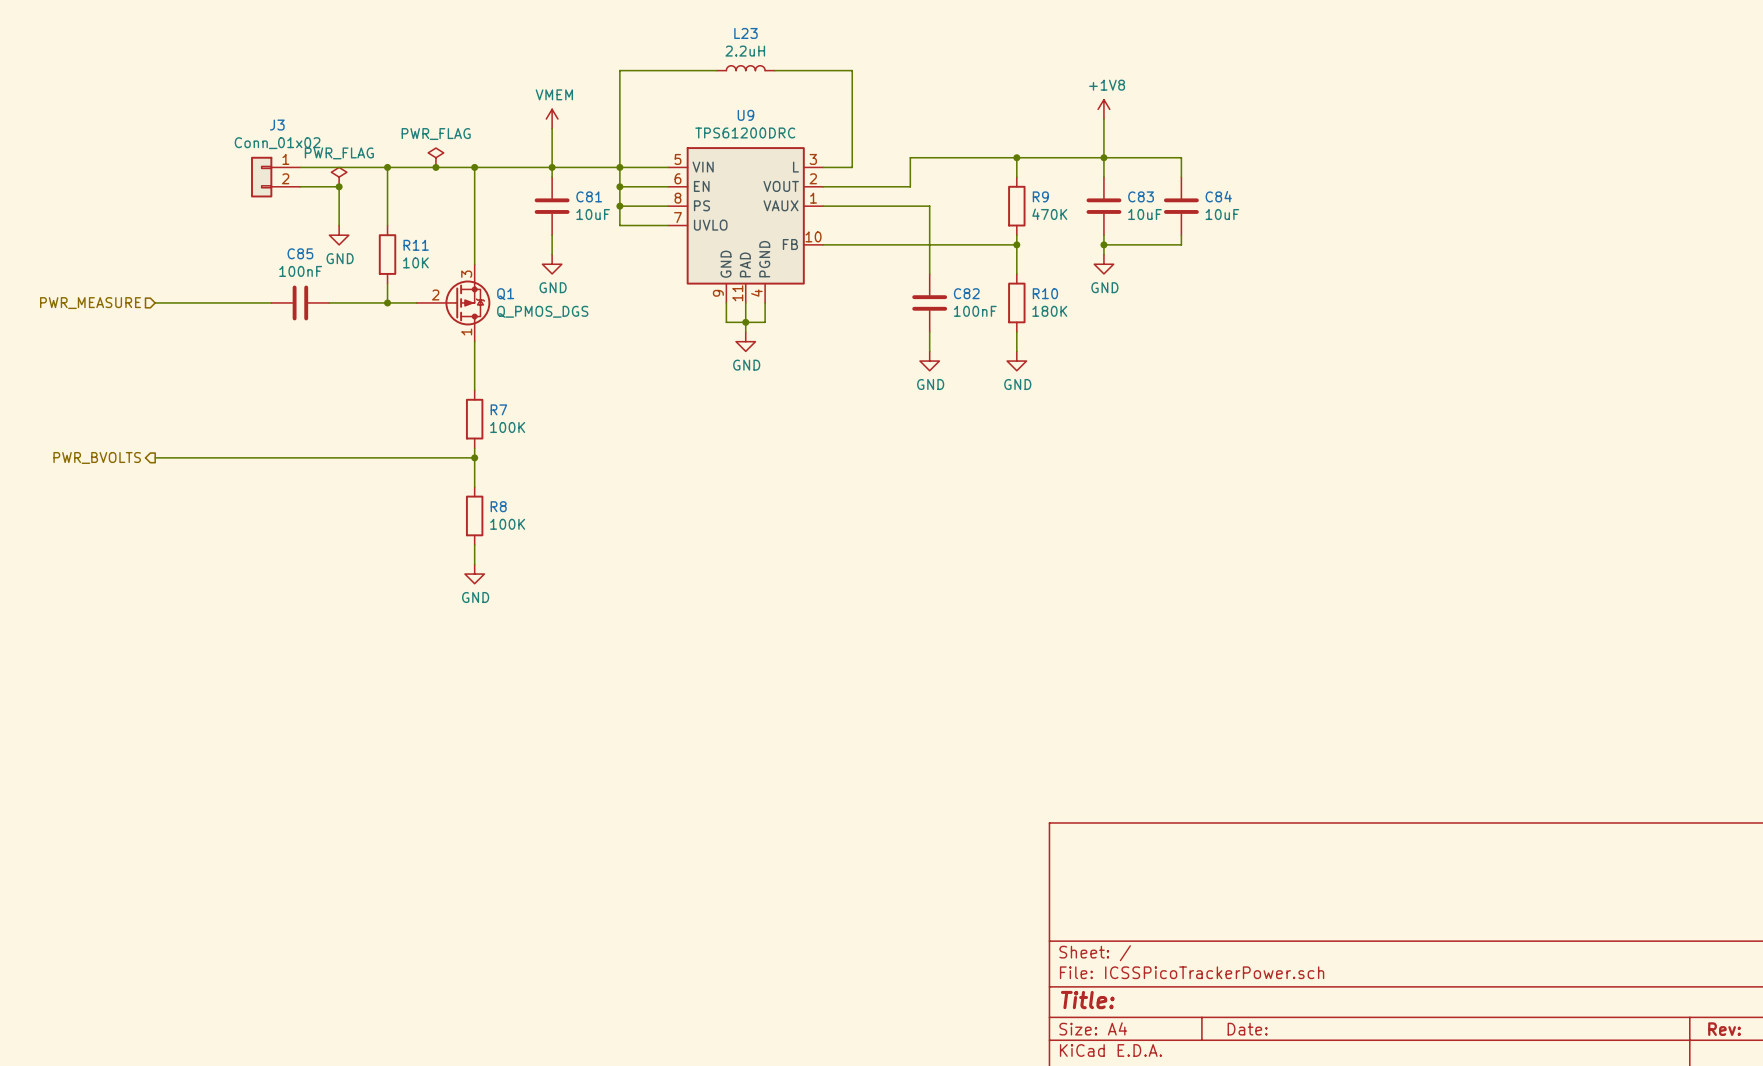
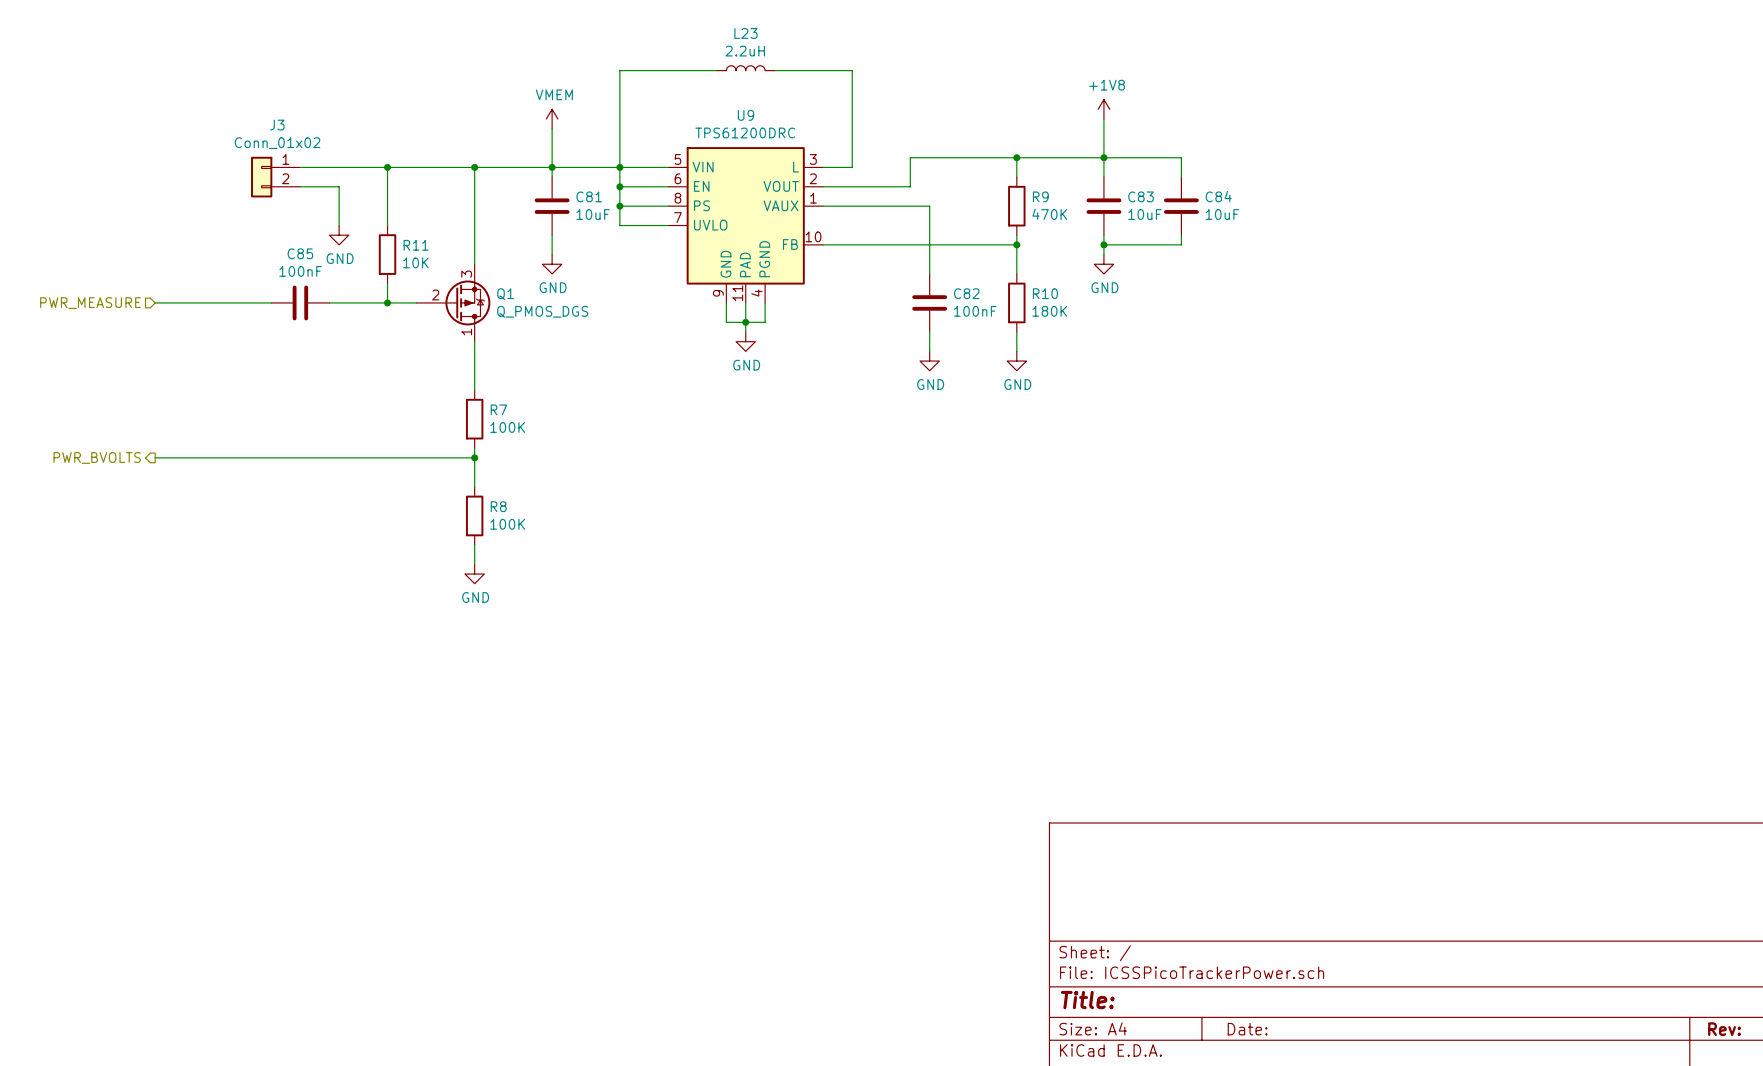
power symbol: PWR_FLAG (435, 157) -> none
junction: (435, 167) -> none
power symbol: PWR_FLAG (339, 177) -> none
junction: (339, 186) -> none

